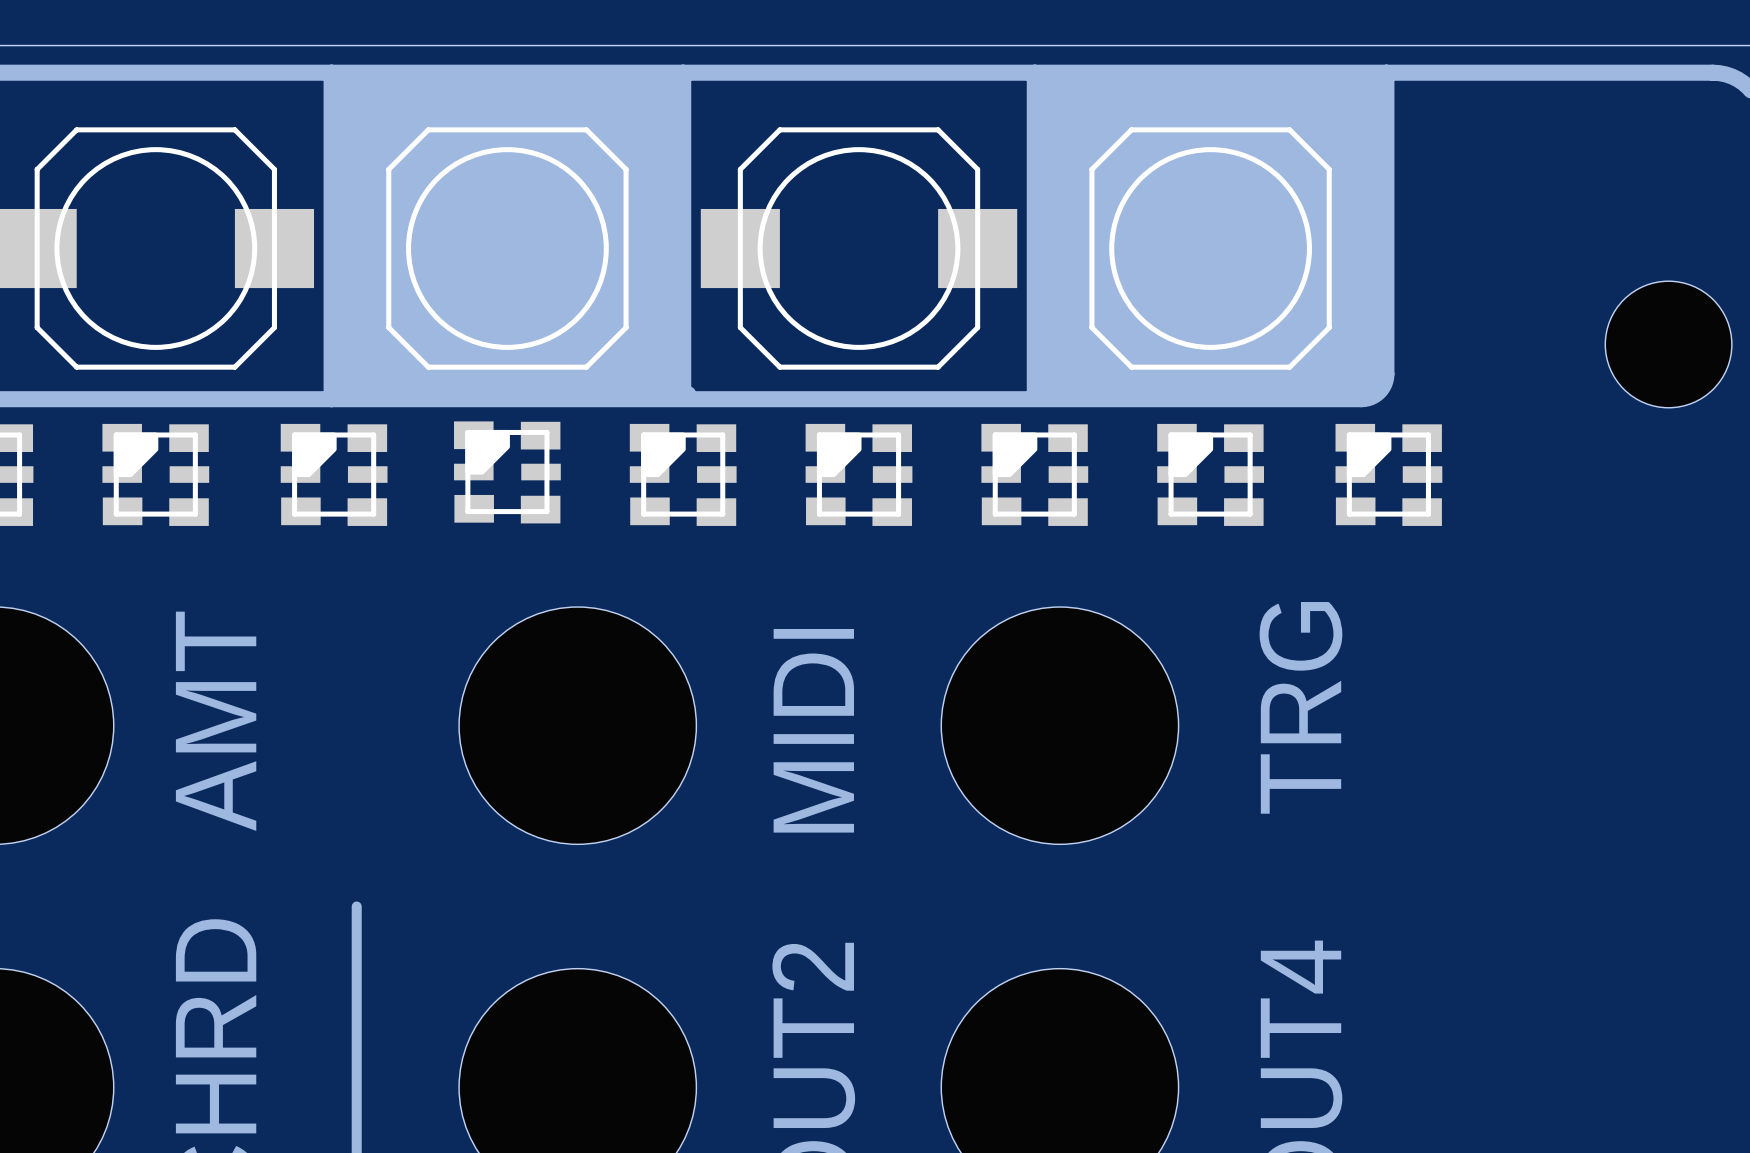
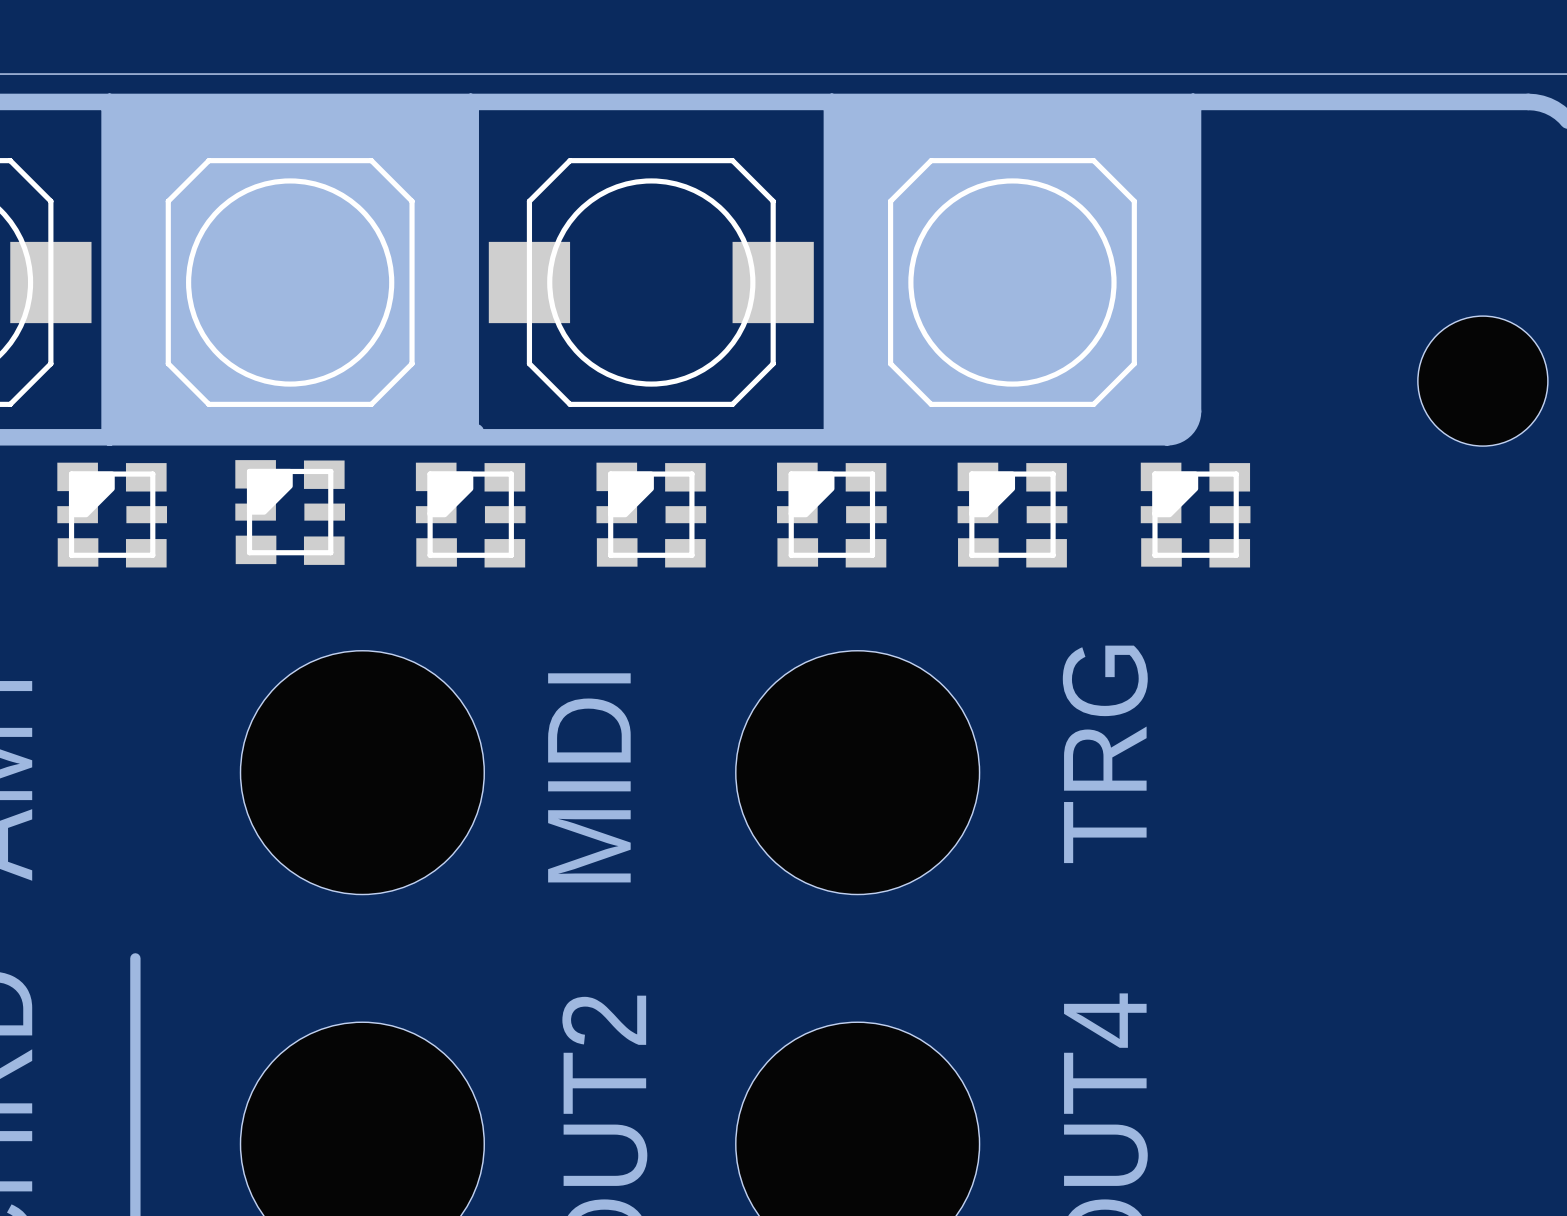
text position: MIDI (813, 730) -> MIDI (589, 777)

